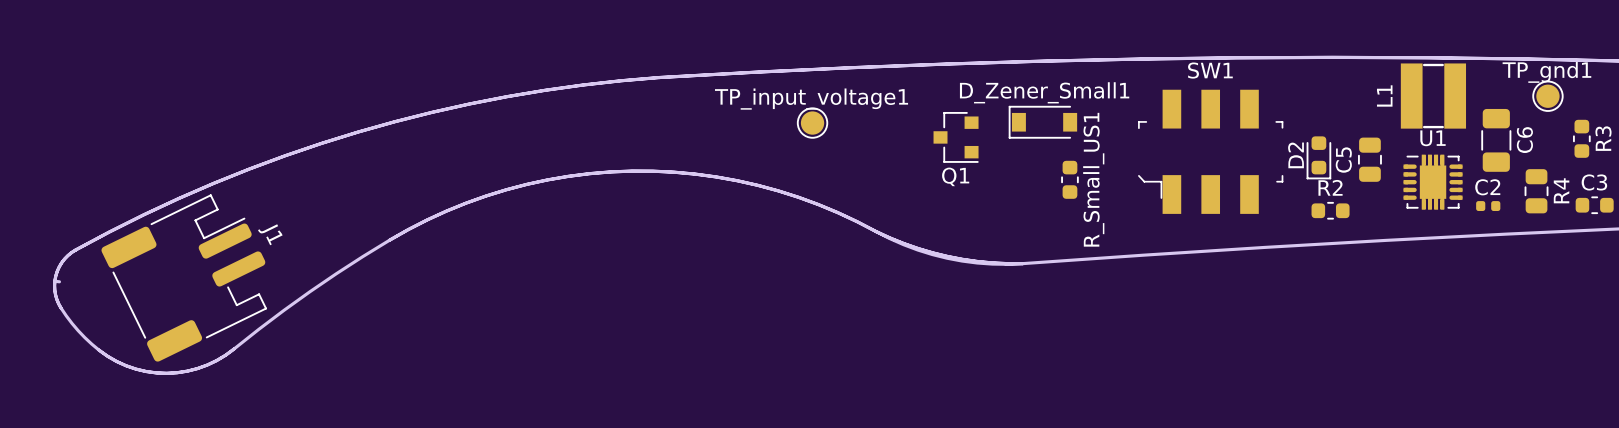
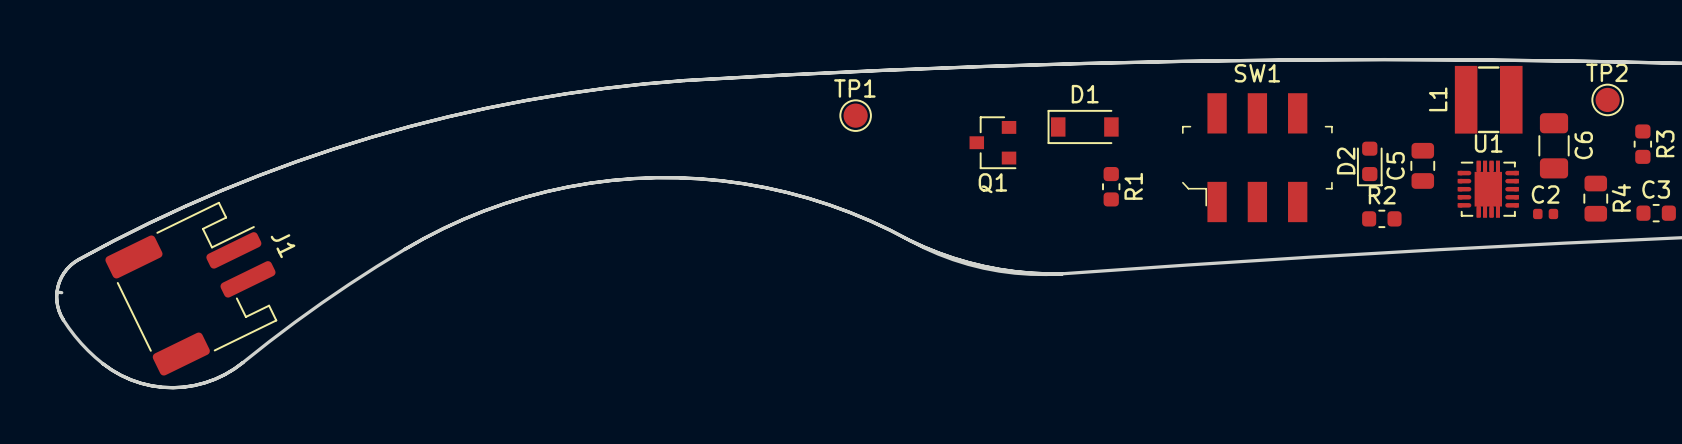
TP_gnd1 name: TP_gnd1 (1546, 72) -> TP2 (1606, 72)
D_Zener_Small1 name: D_Zener_Small1 (1044, 92) -> D1 (1085, 94)
TP1: none -> (855, 115)
TP_input_voltage1: (812, 123) -> none
R_Small_US1 name: R_Small_US1 (1093, 179) -> R1 (1133, 186)

